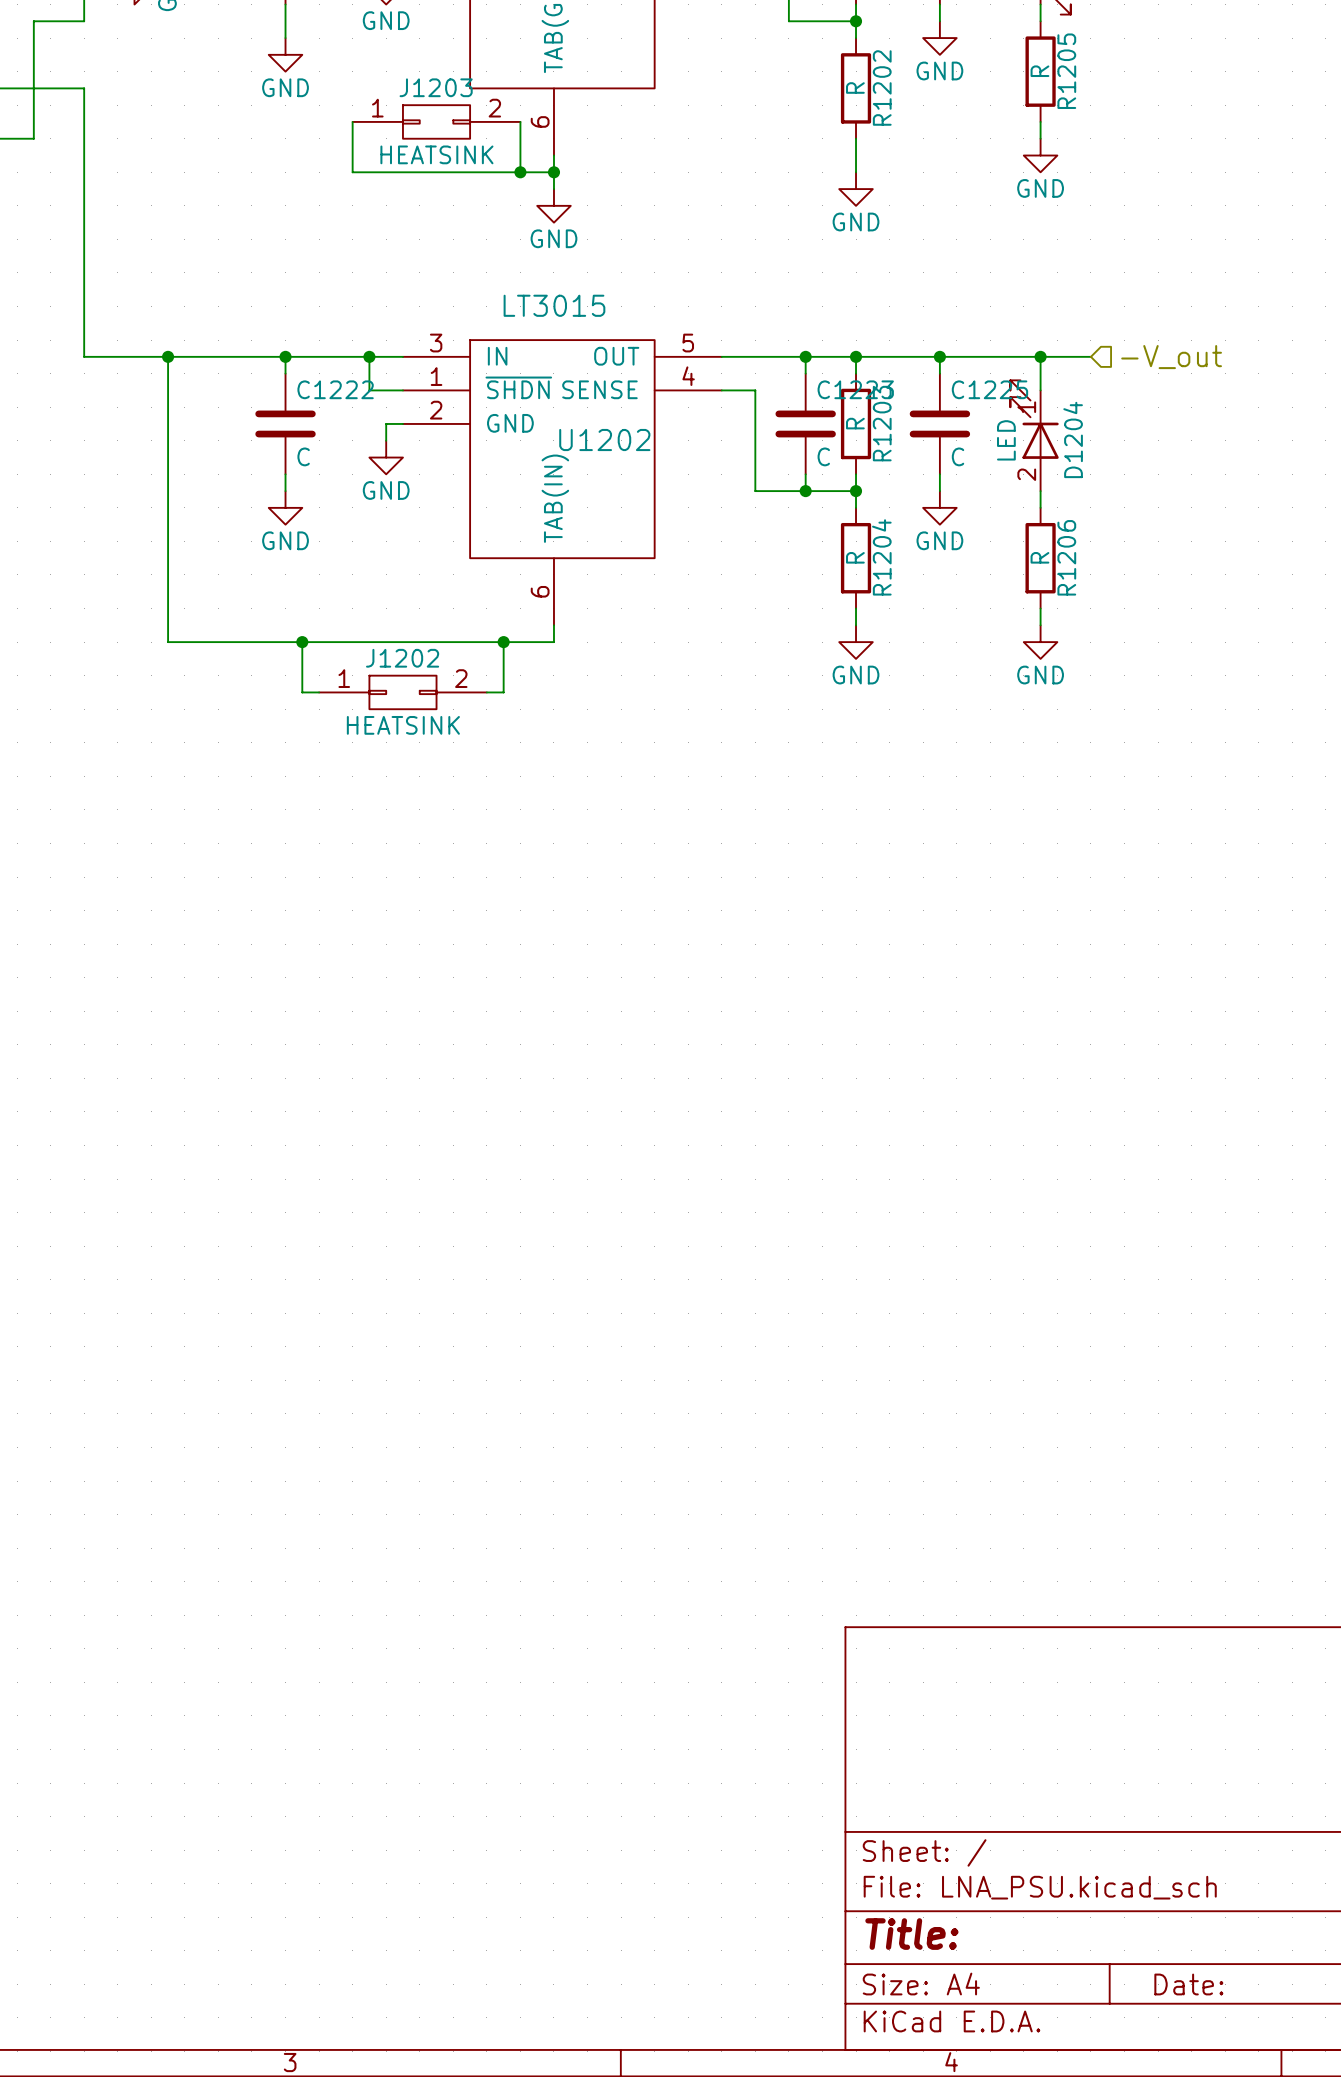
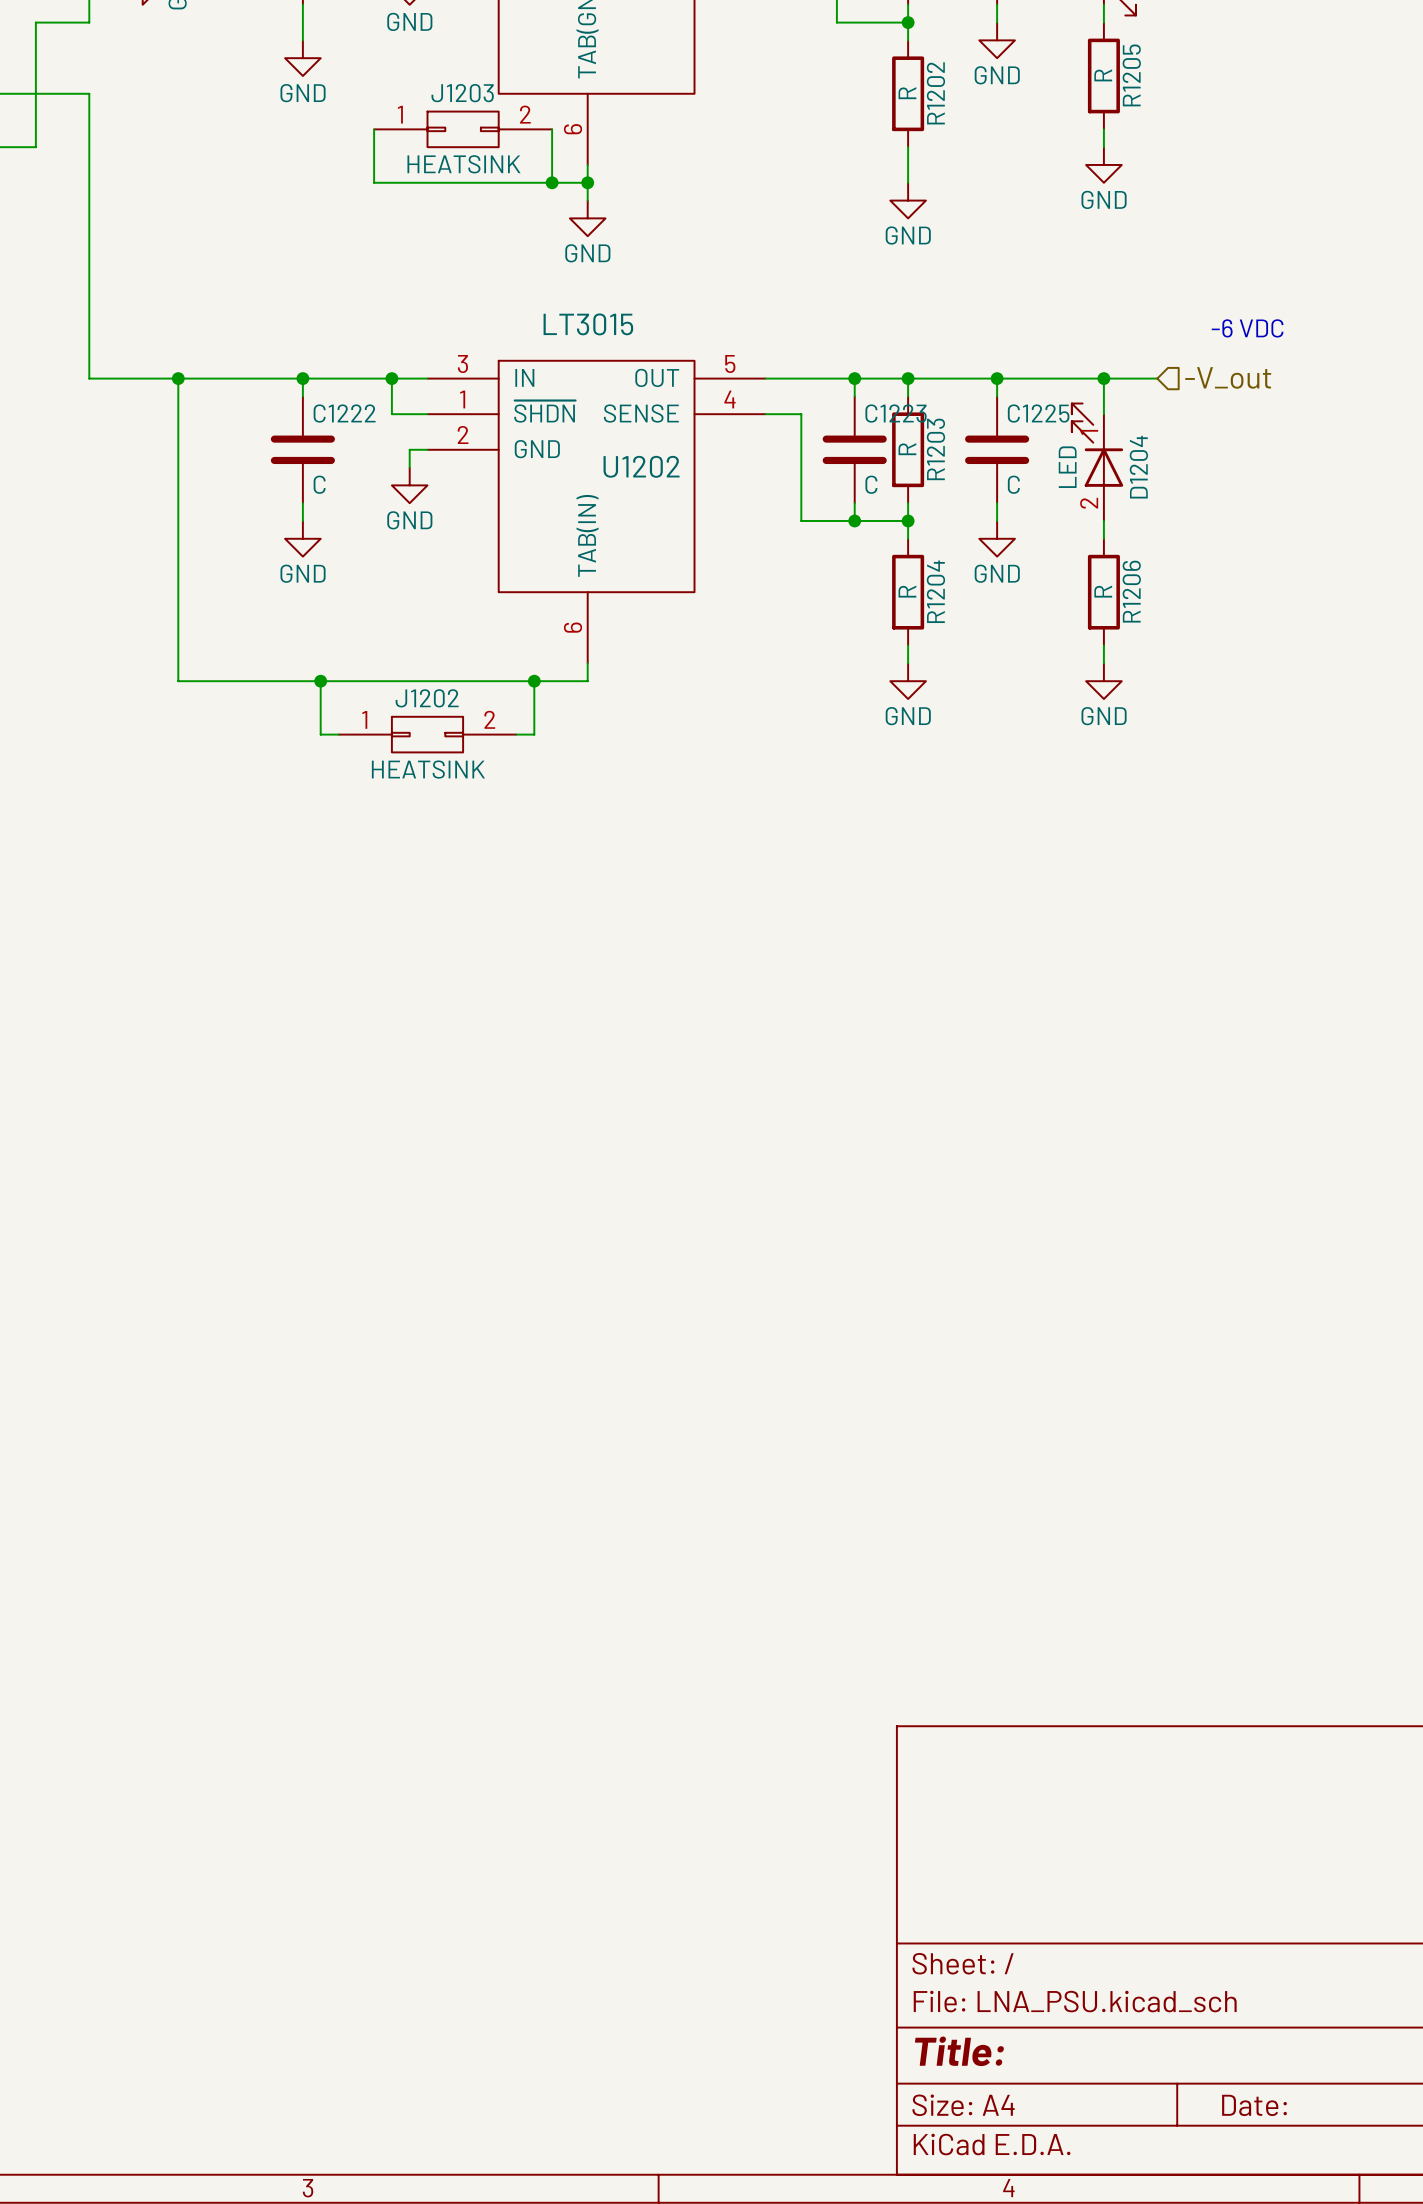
text: none -> -6 VDC (1247, 328)

